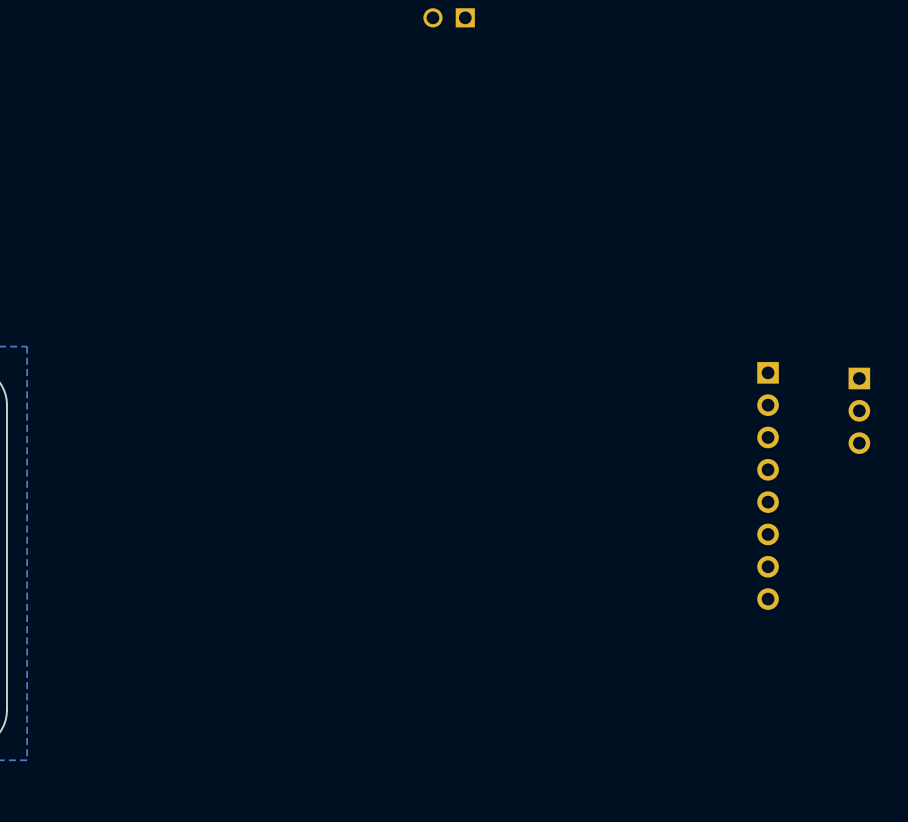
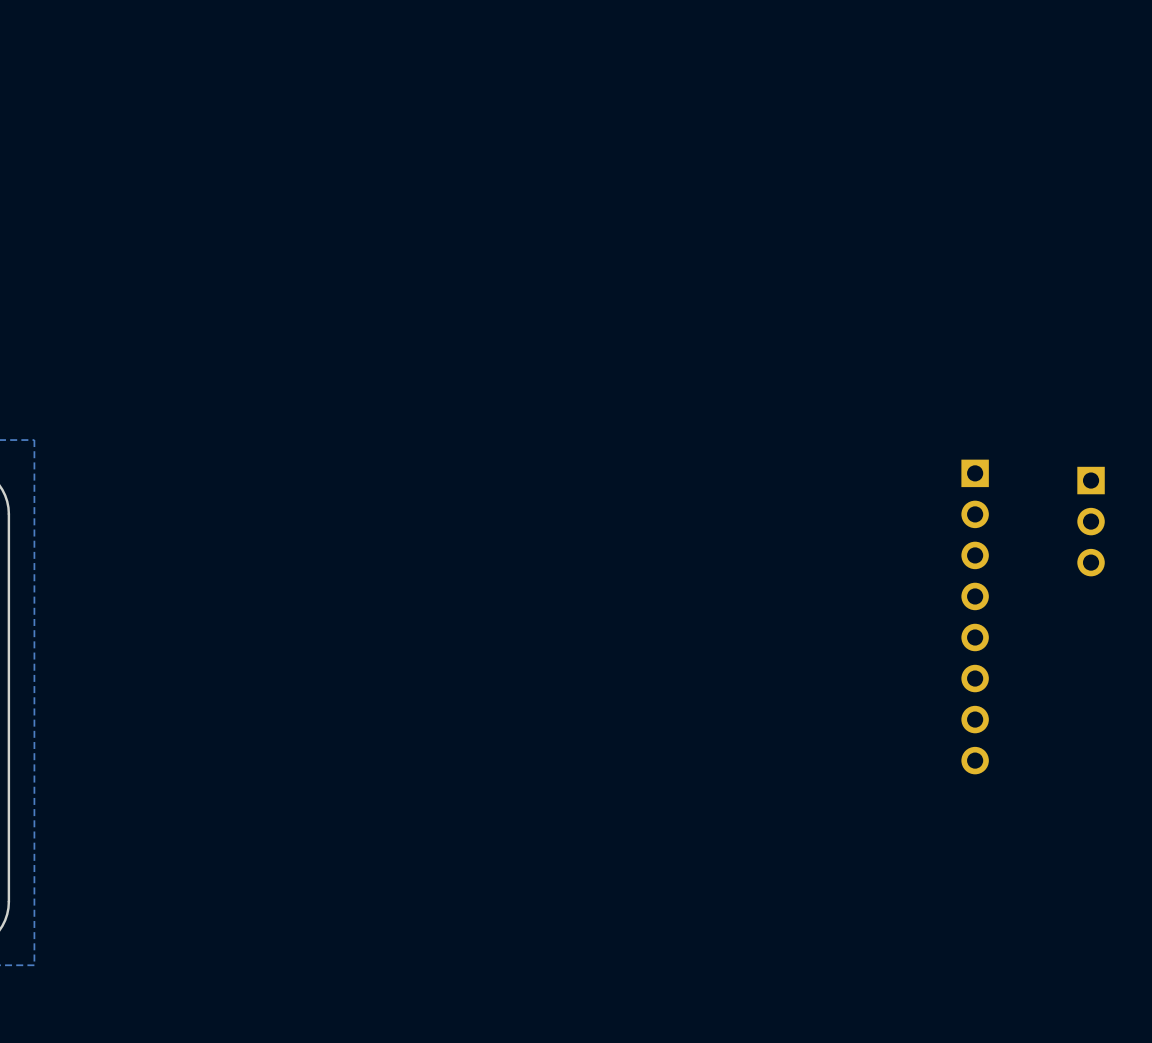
part: (449, 17) -> none

